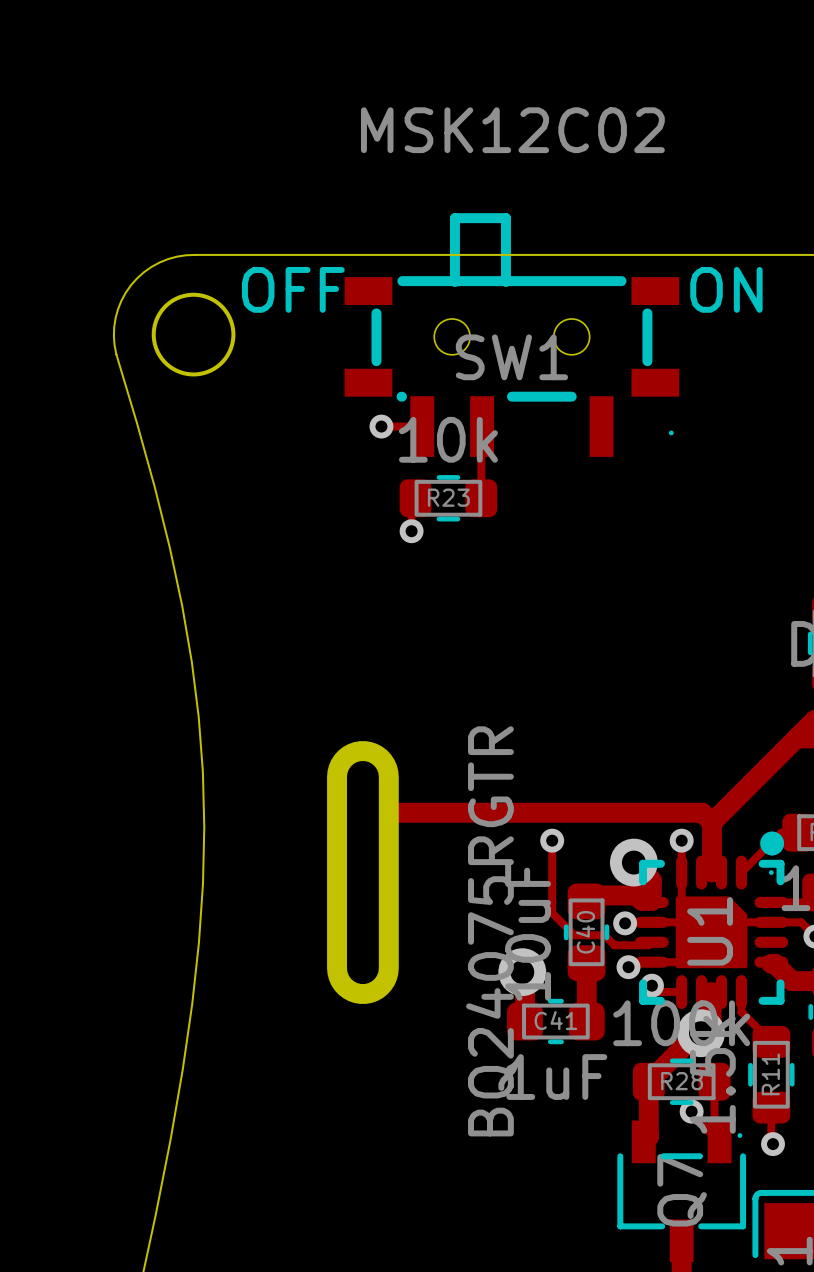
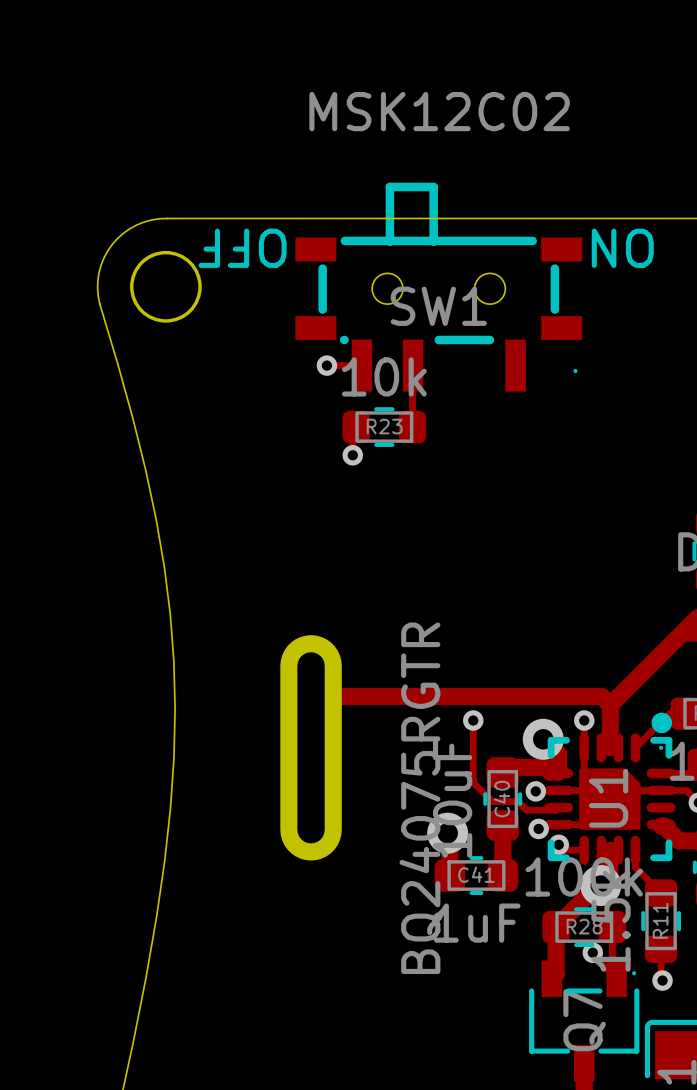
text rotation: 0° (293, 289) -> 180° (242, 248)
text rotation: 0° (726, 289) -> 180° (622, 248)

